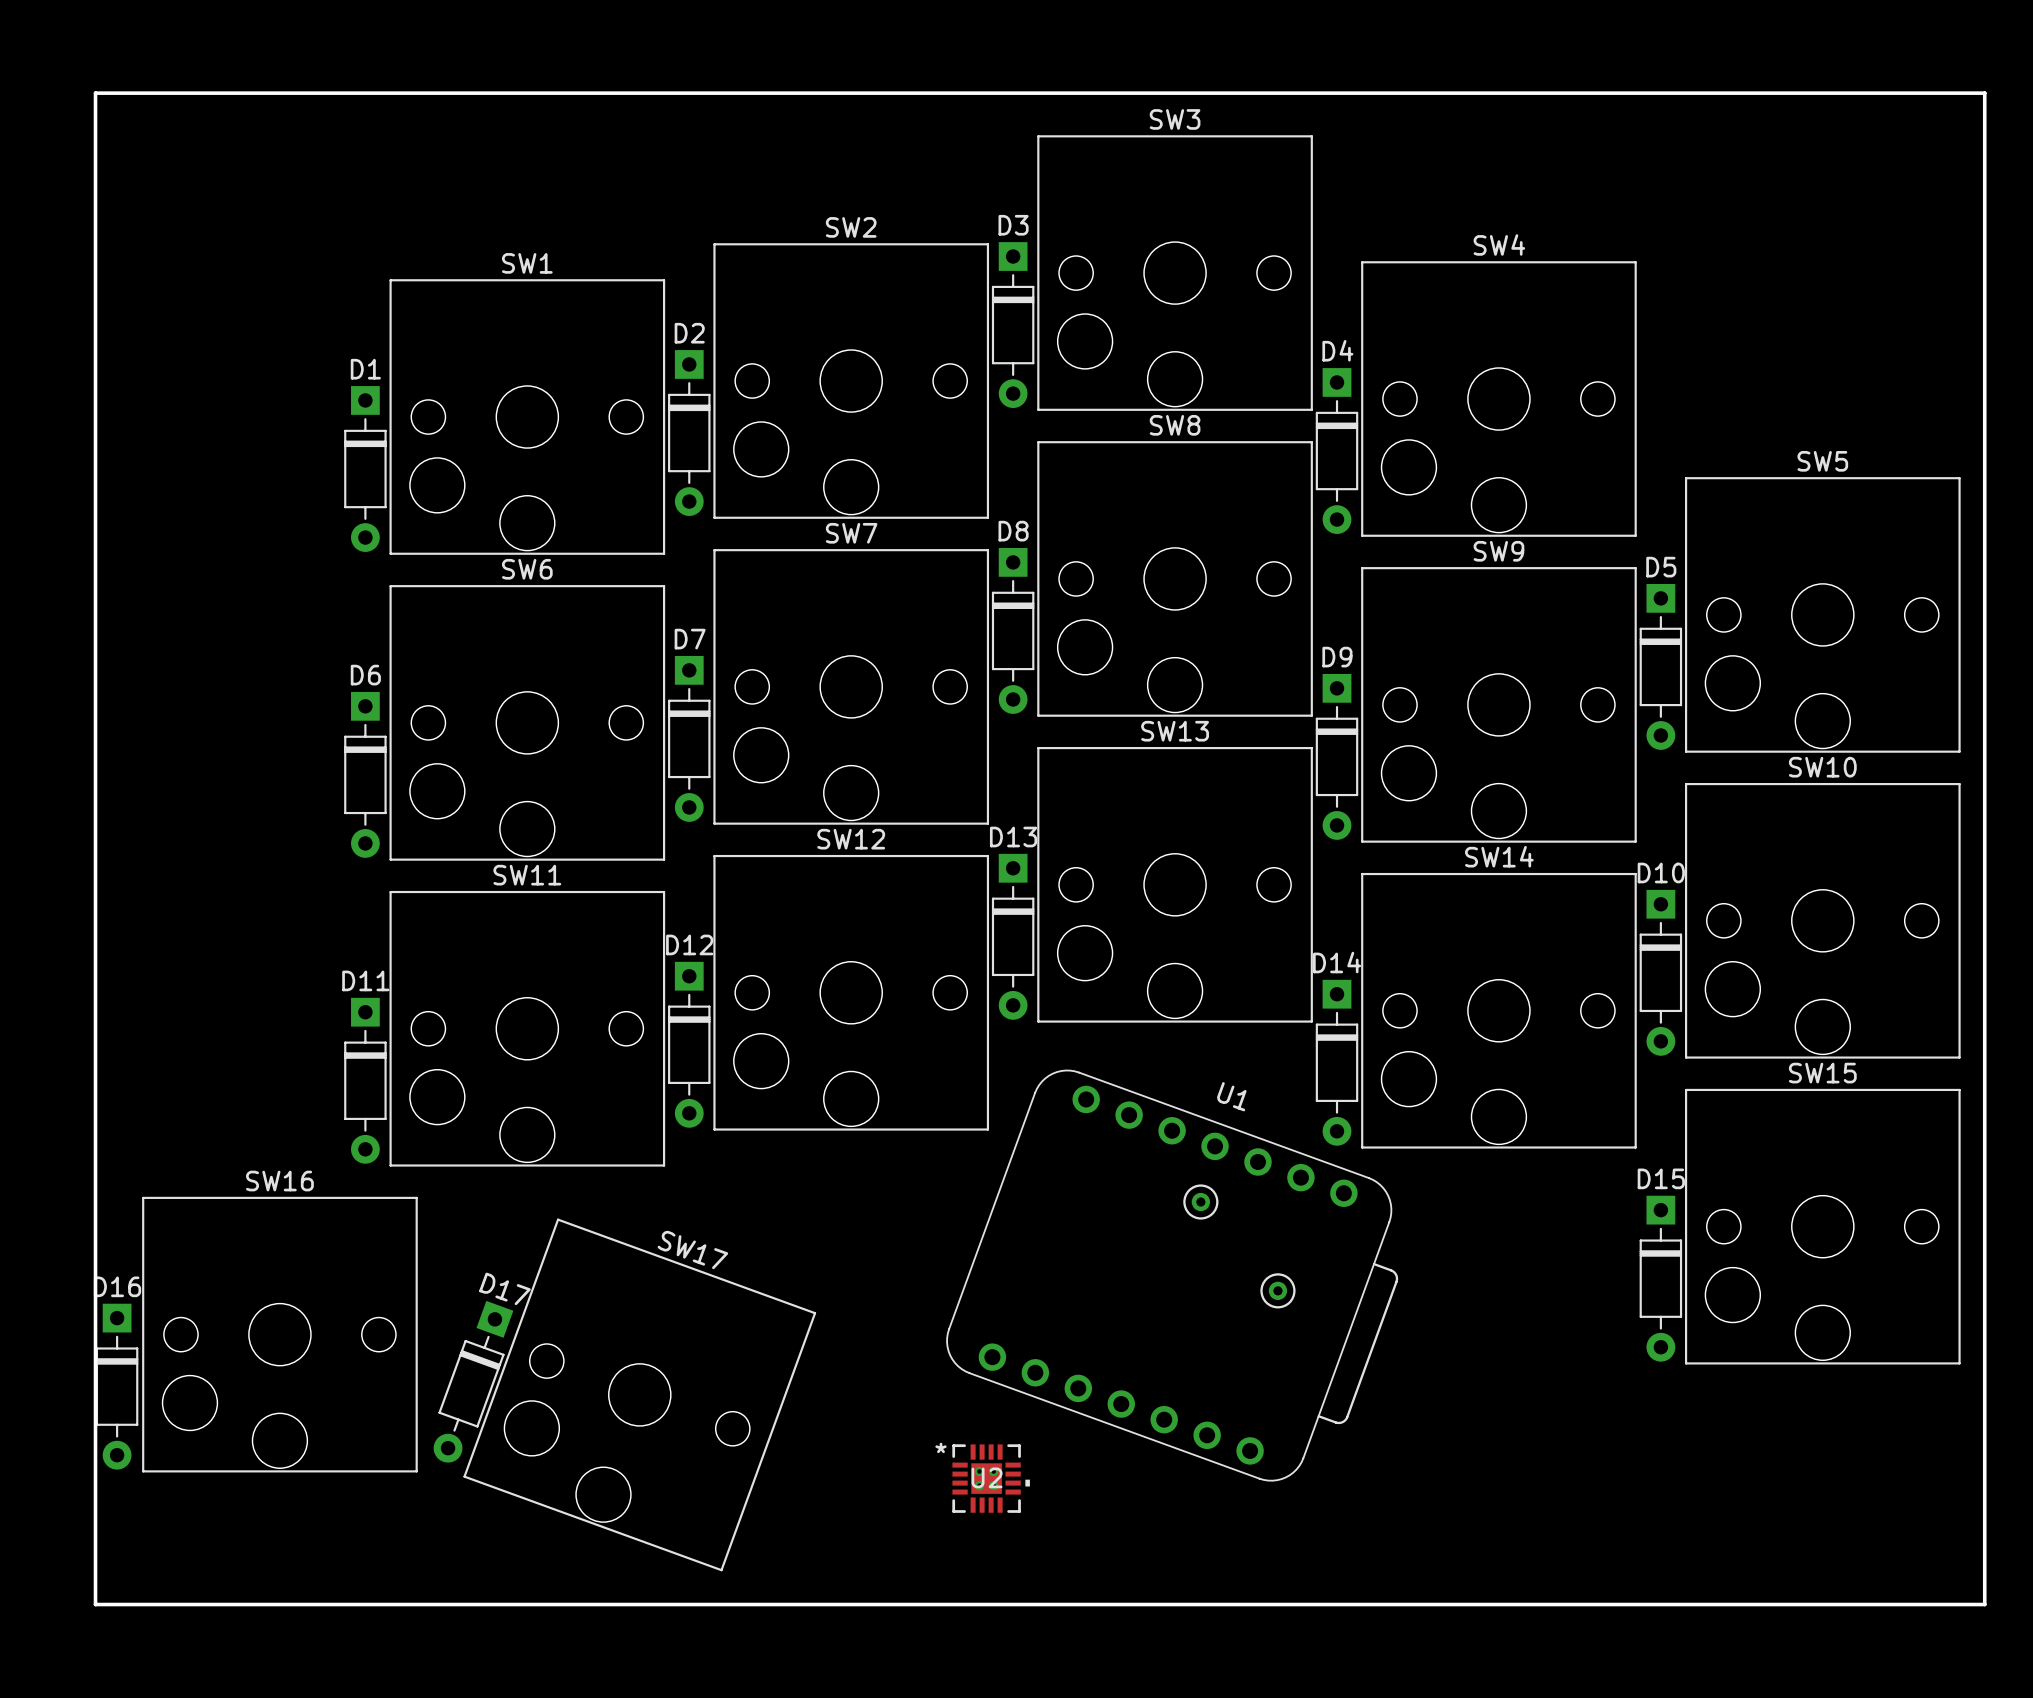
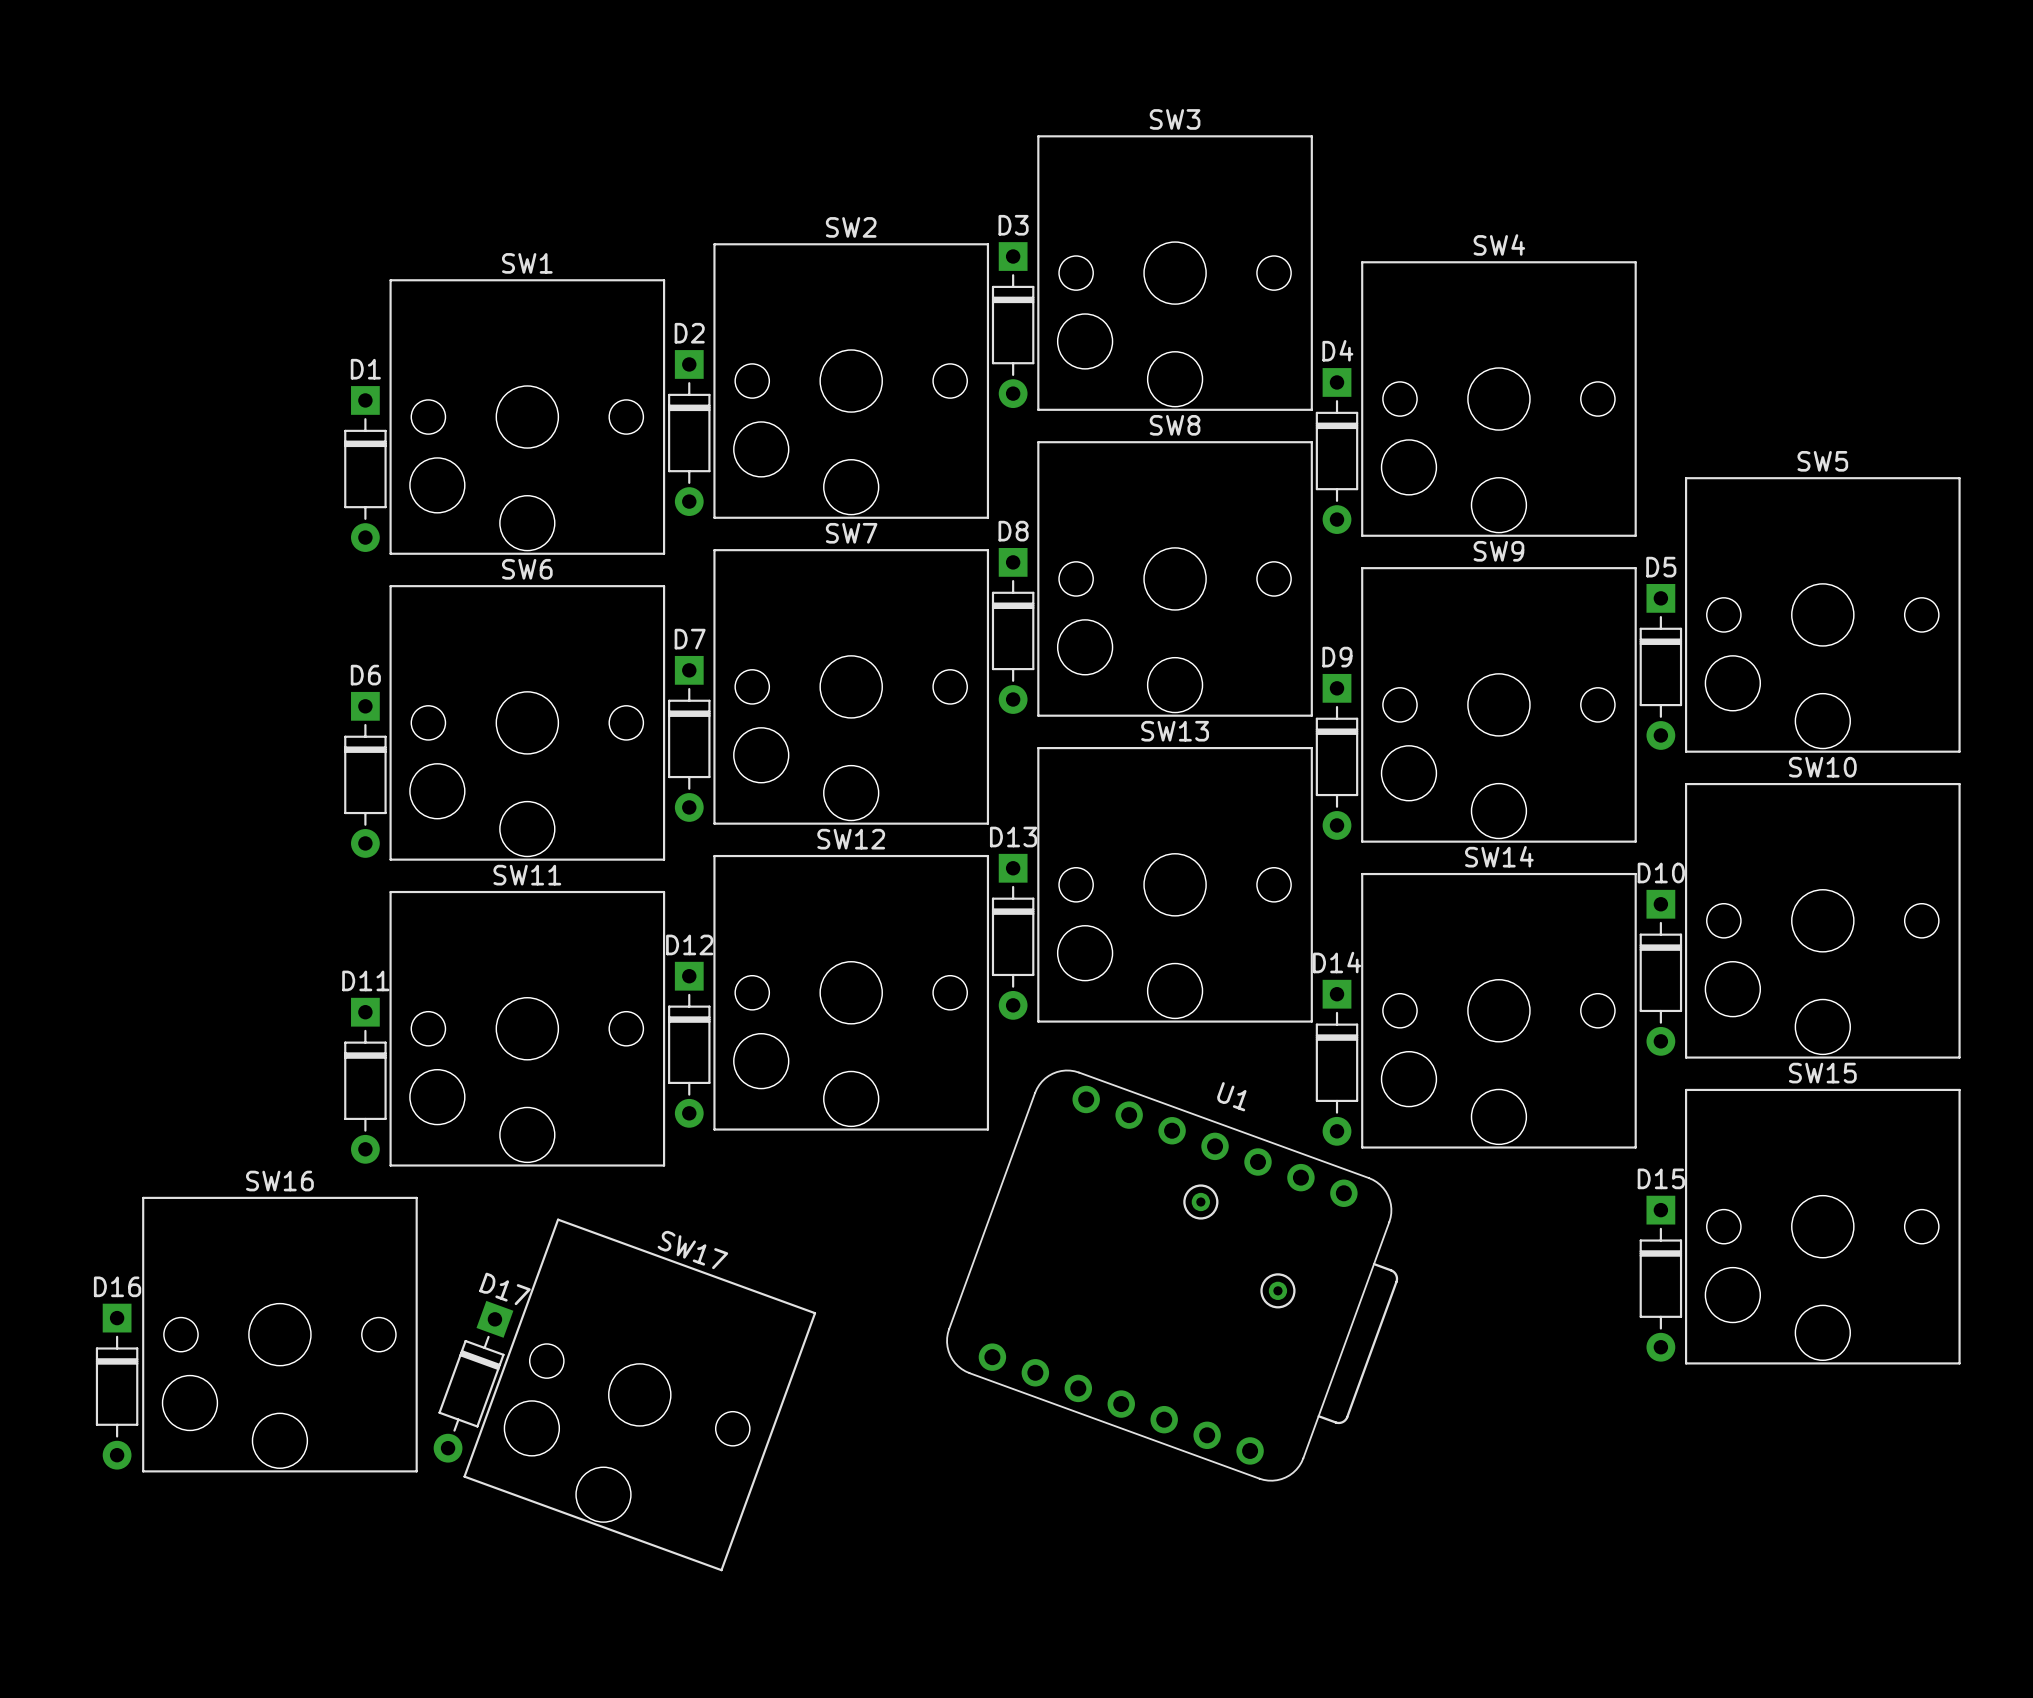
board edge: (95, 93) (1984, 93) (1984, 1604) (95, 1604) (95, 93) -> none
U2: (991, 1478) -> none

